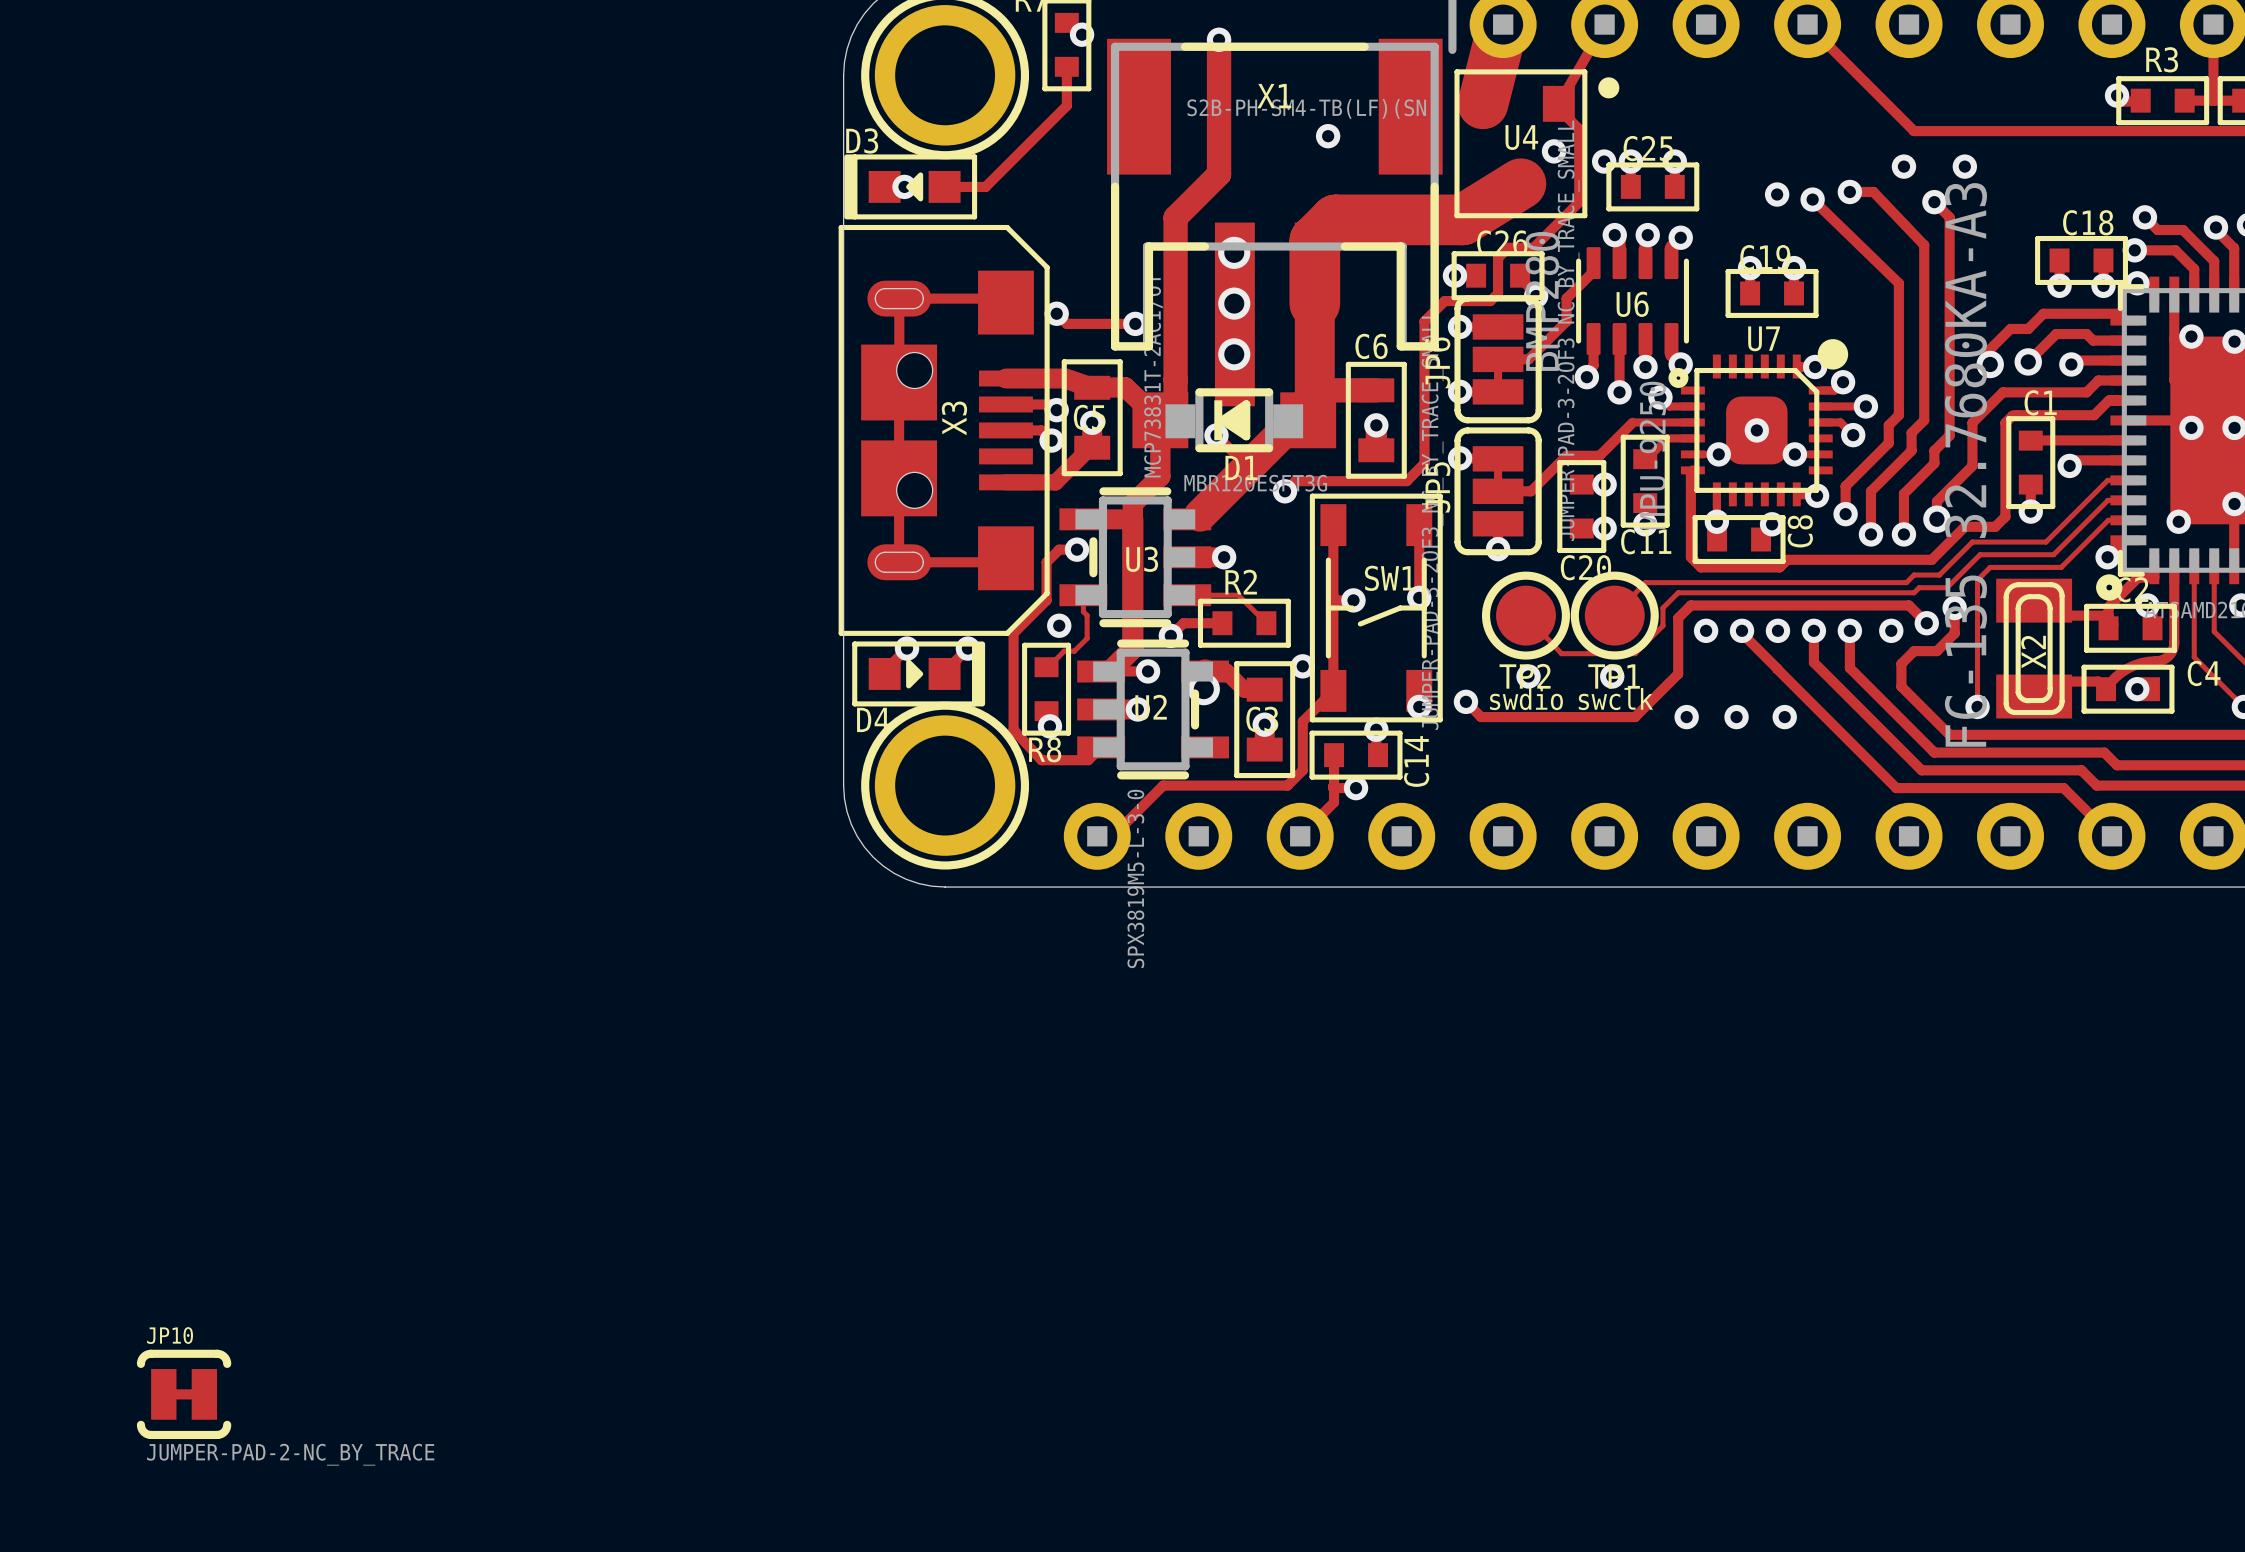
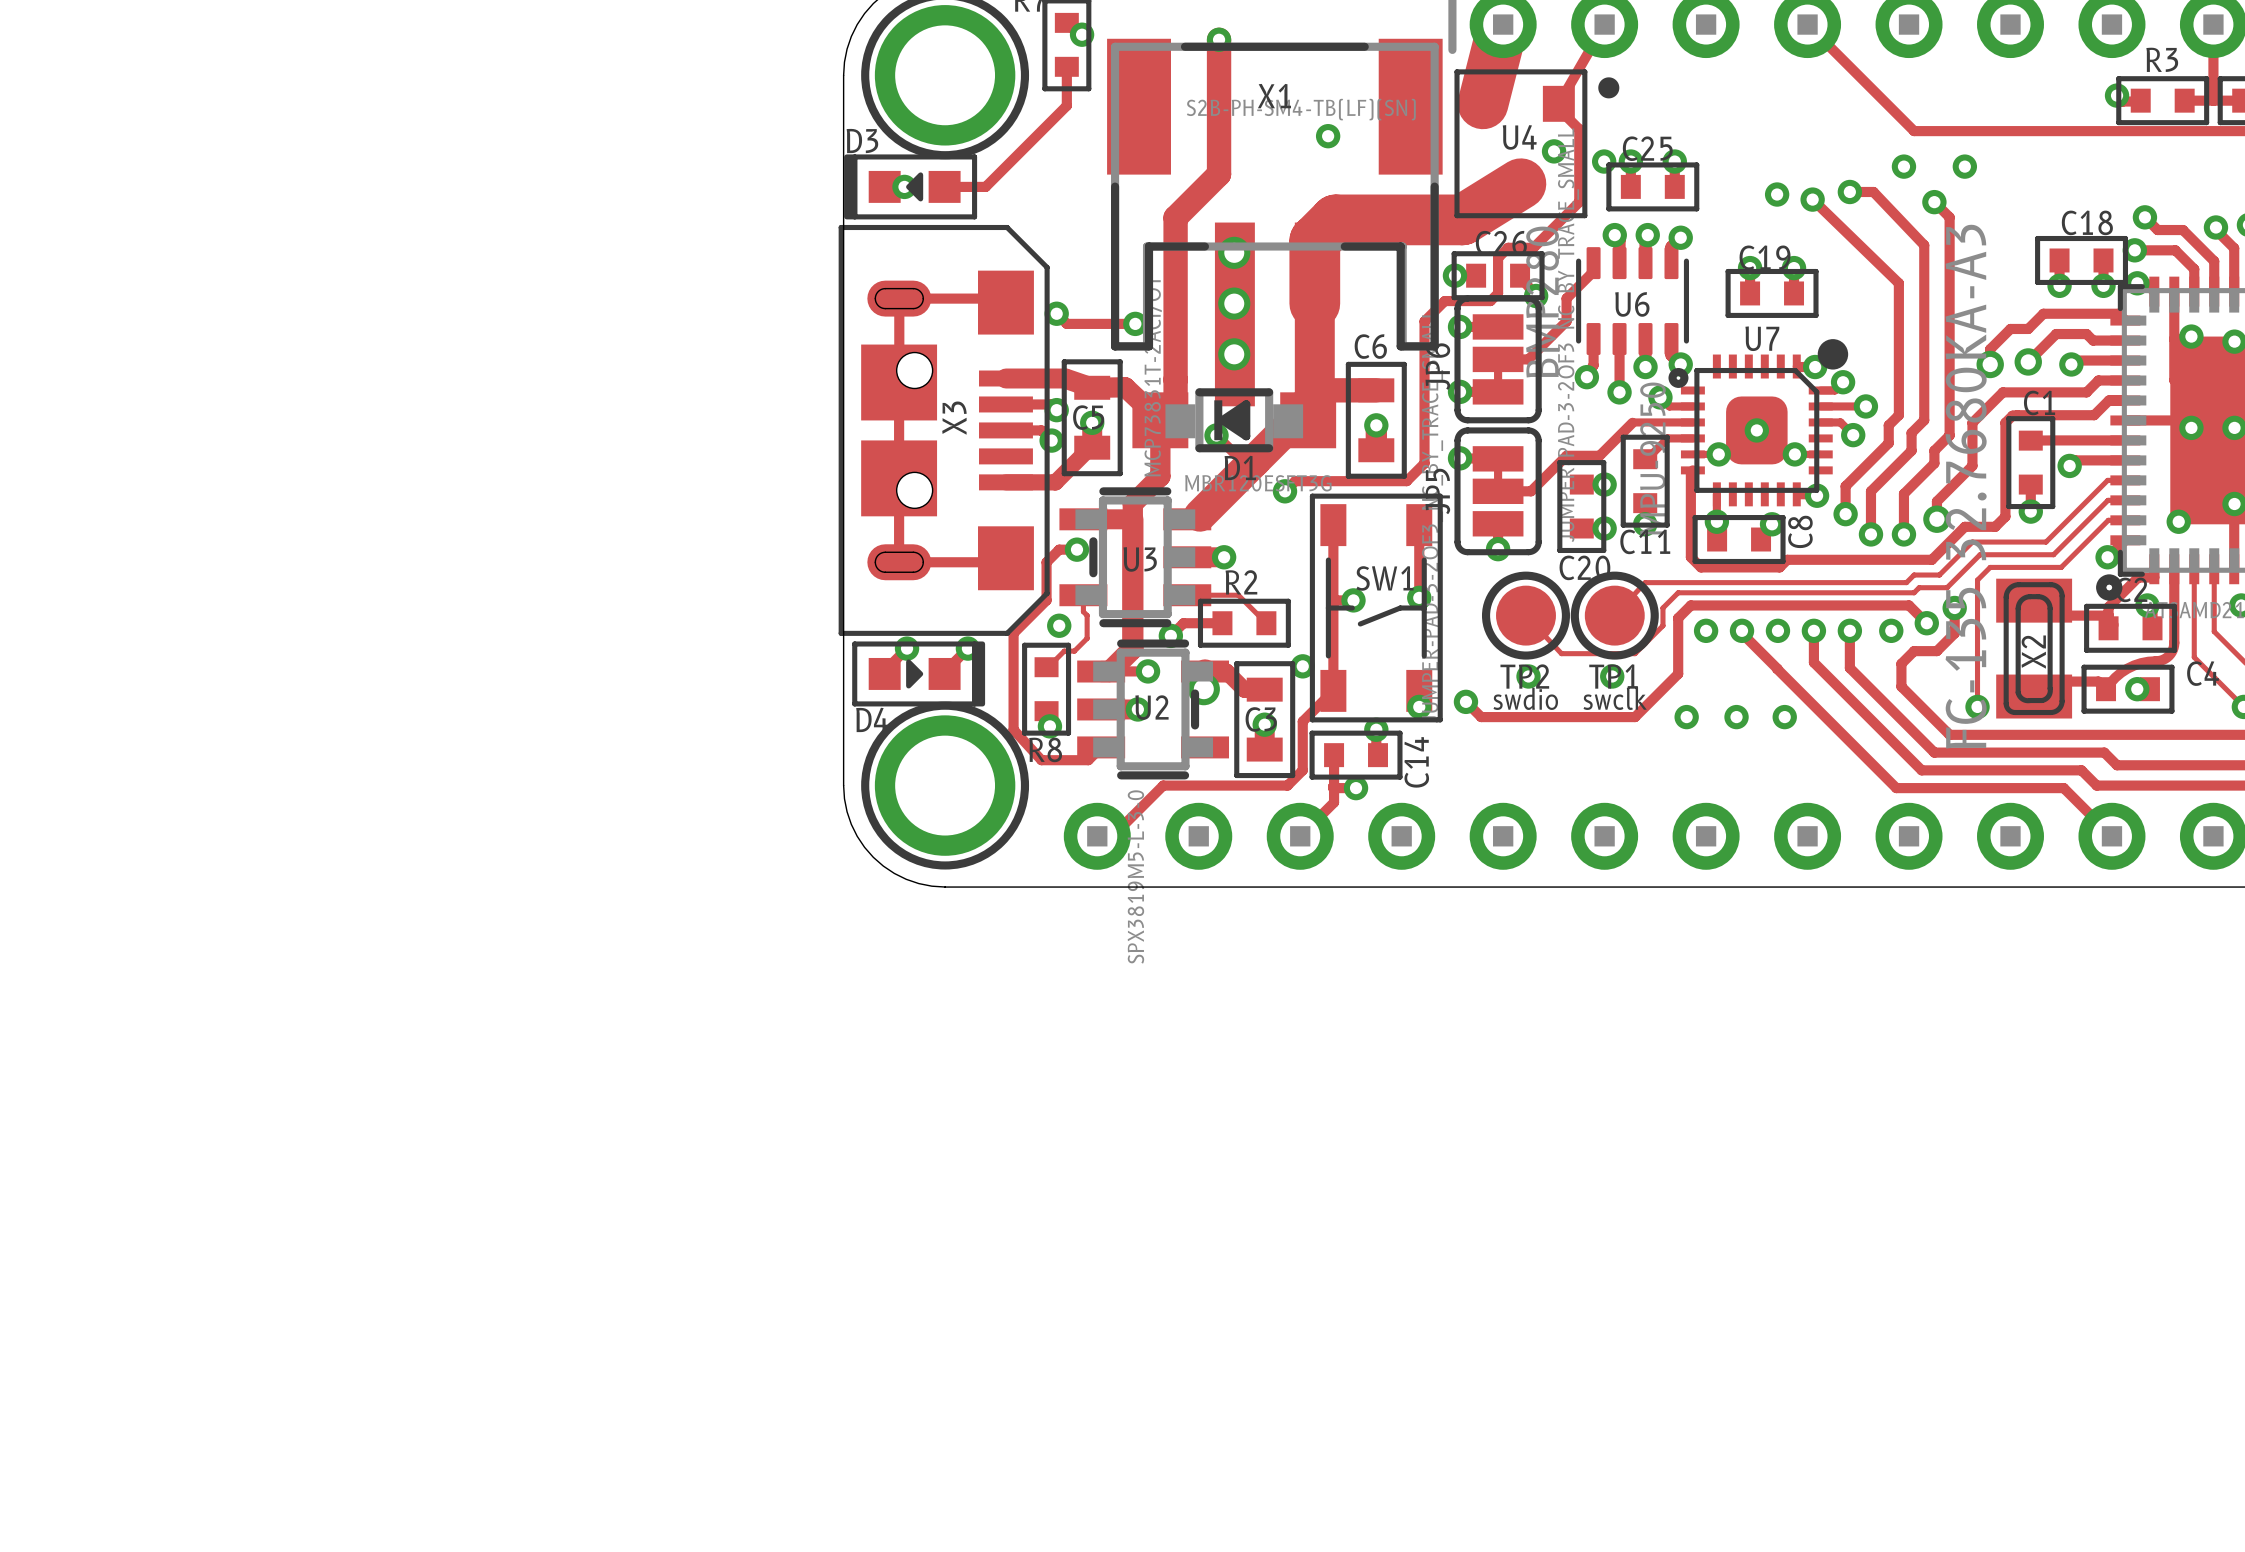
JP10: JUMPER-PAD-2-NC_BY_TRACE (184, 1394) -> none

